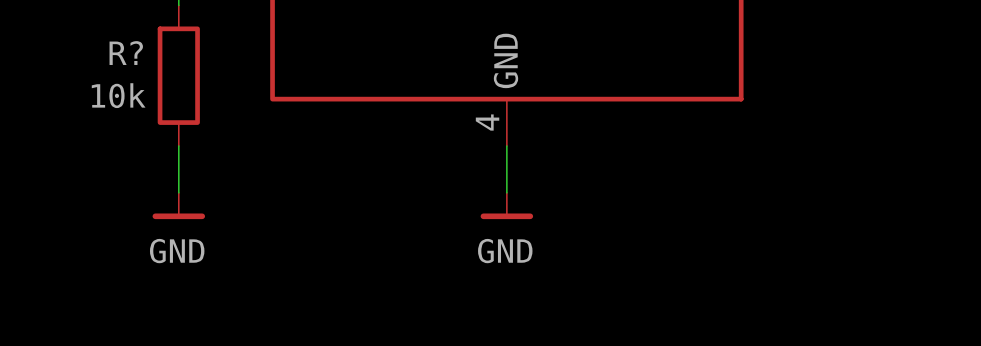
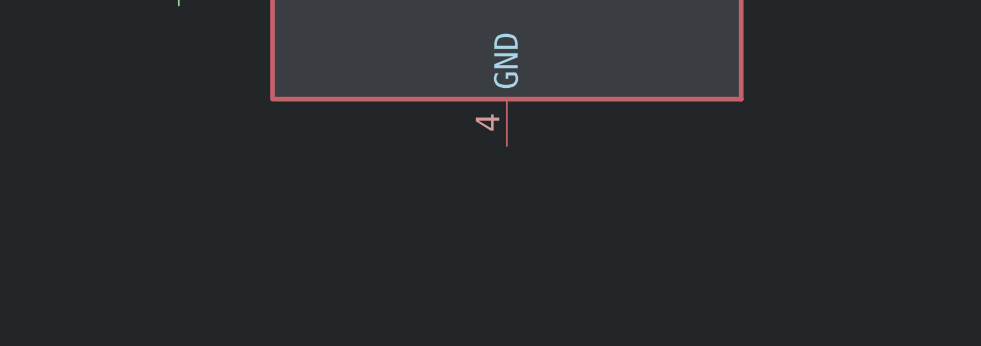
R?: 10k (178, 75) -> none
wire: (178, 146) (178, 192) -> none
wire: (506, 146) (506, 192) -> none
power symbol: GND (178, 205) -> none
power symbol: GND (506, 205) -> none

